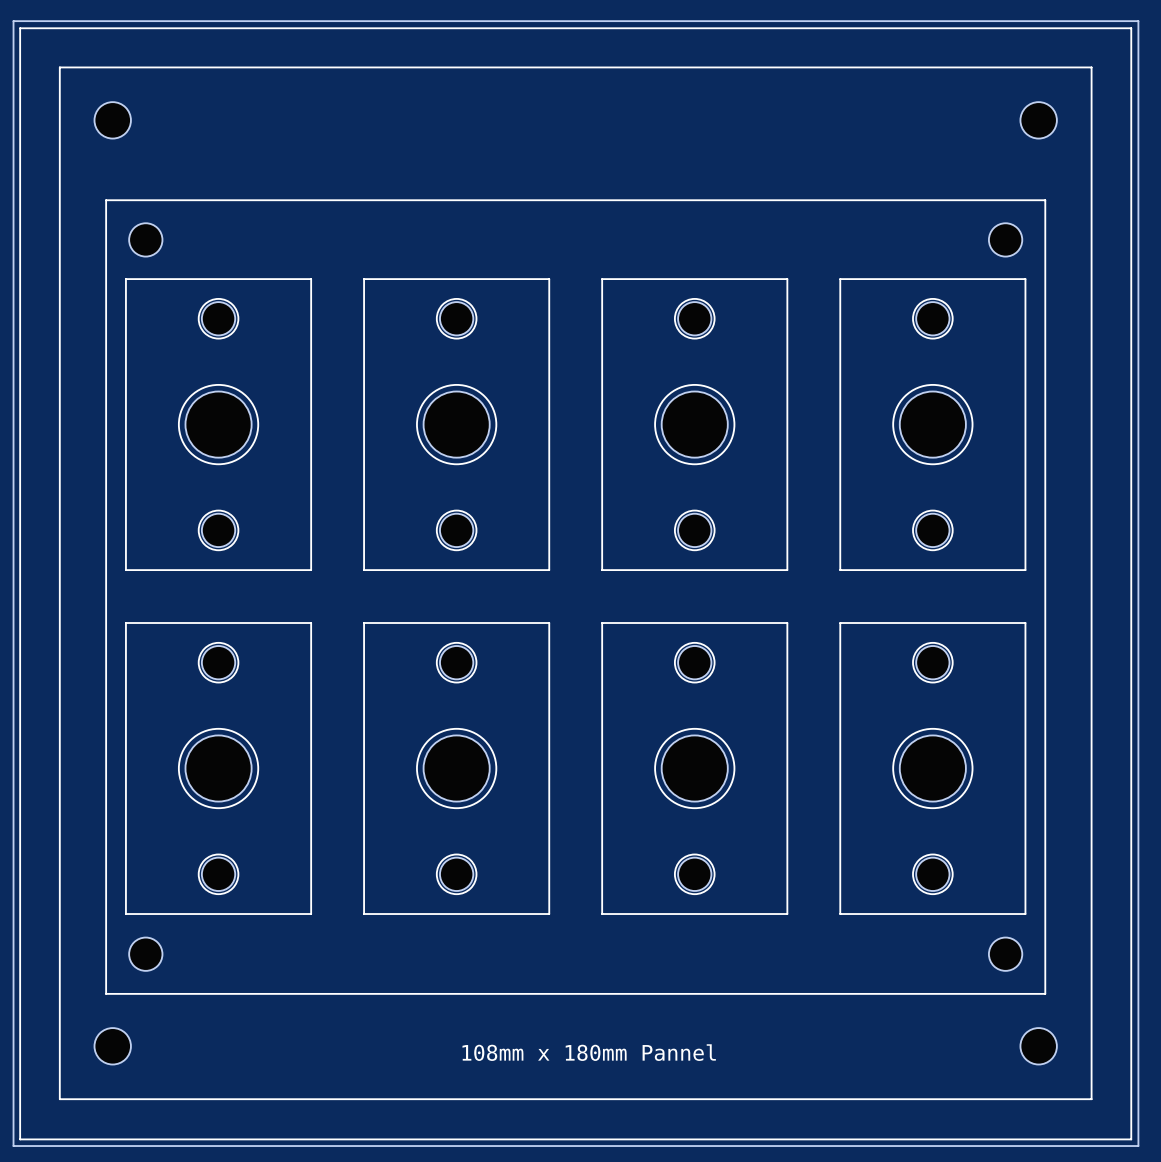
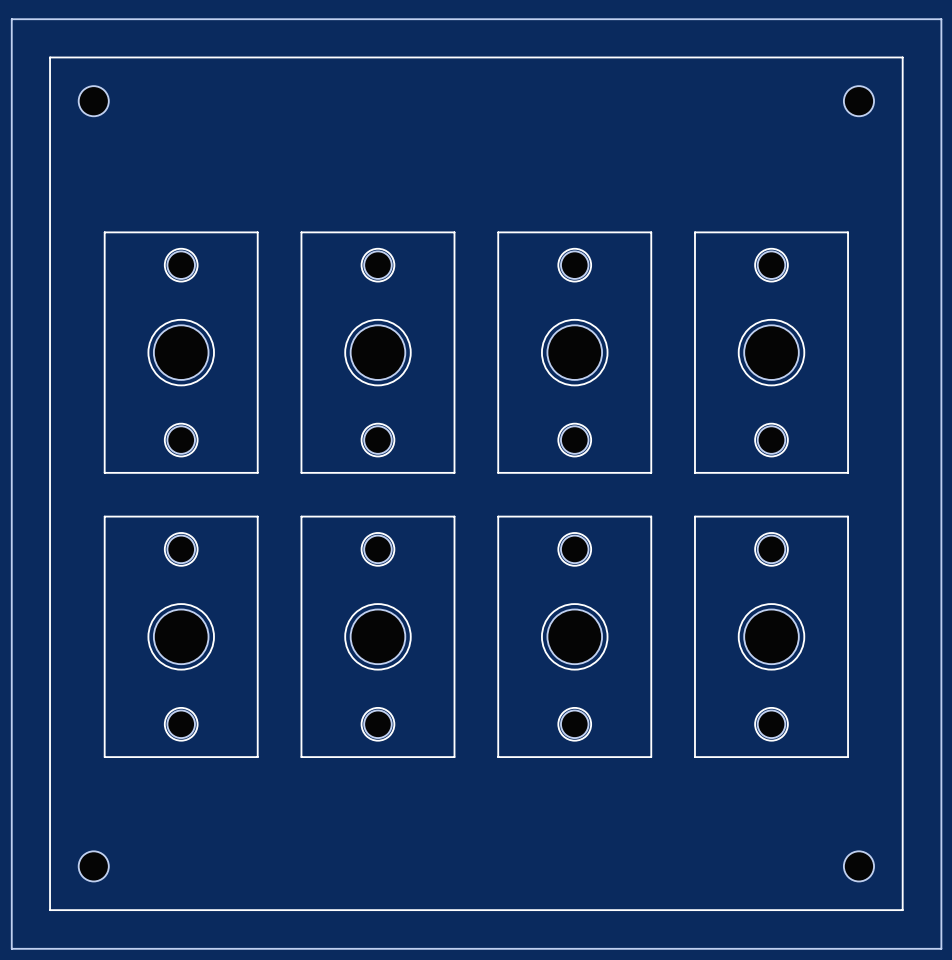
line: (20, 28) (20, 1139) (1131, 1139) (1131, 28) (20, 28) -> none
line: (106, 200) (1045, 200) (1045, 993) (106, 993) (106, 200) -> none
part: (145, 239) -> none
part: (1005, 239) -> none
part: (145, 954) -> none
part: (1005, 954) -> none
text: 108mm x 180mm Pannel (589, 1052) -> none

